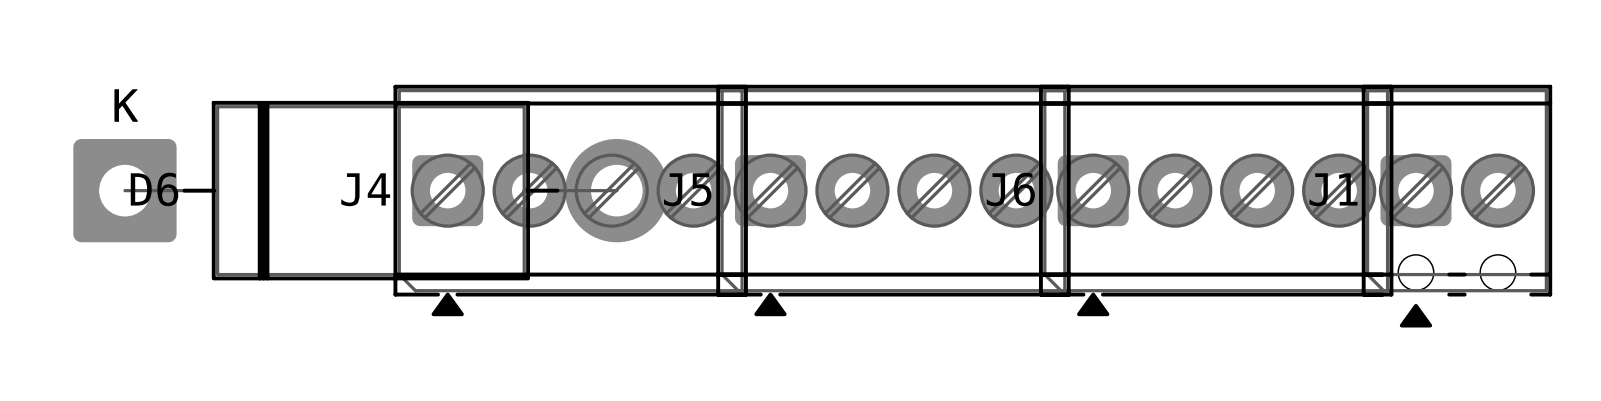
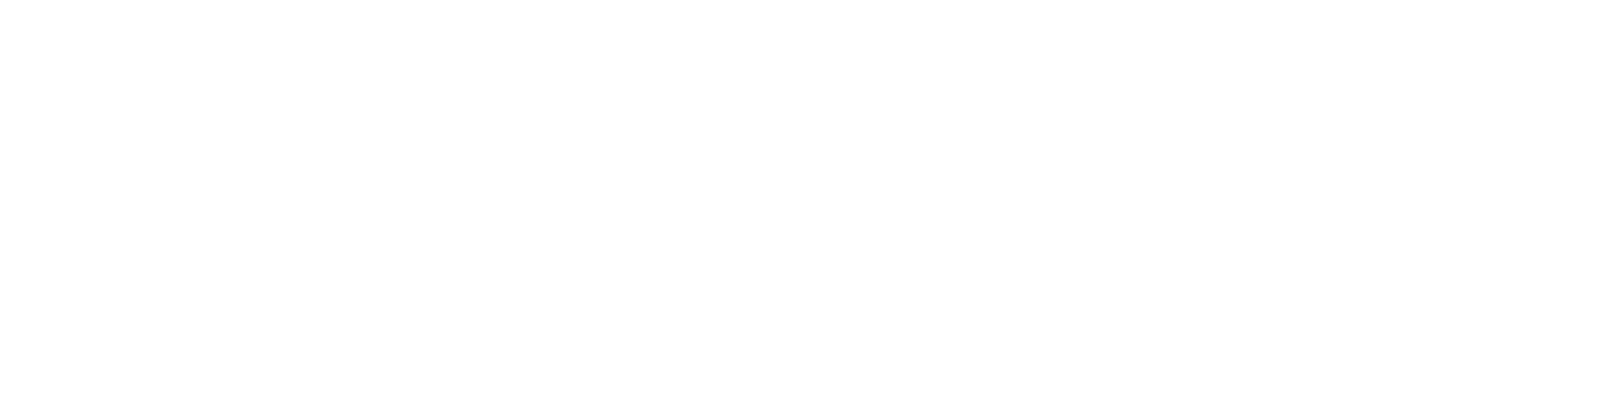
D6: (370, 190) -> none
J4: (570, 200) -> none
J5: (893, 200) -> none
J6: (1216, 200) -> none
J1: (1456, 206) -> none

